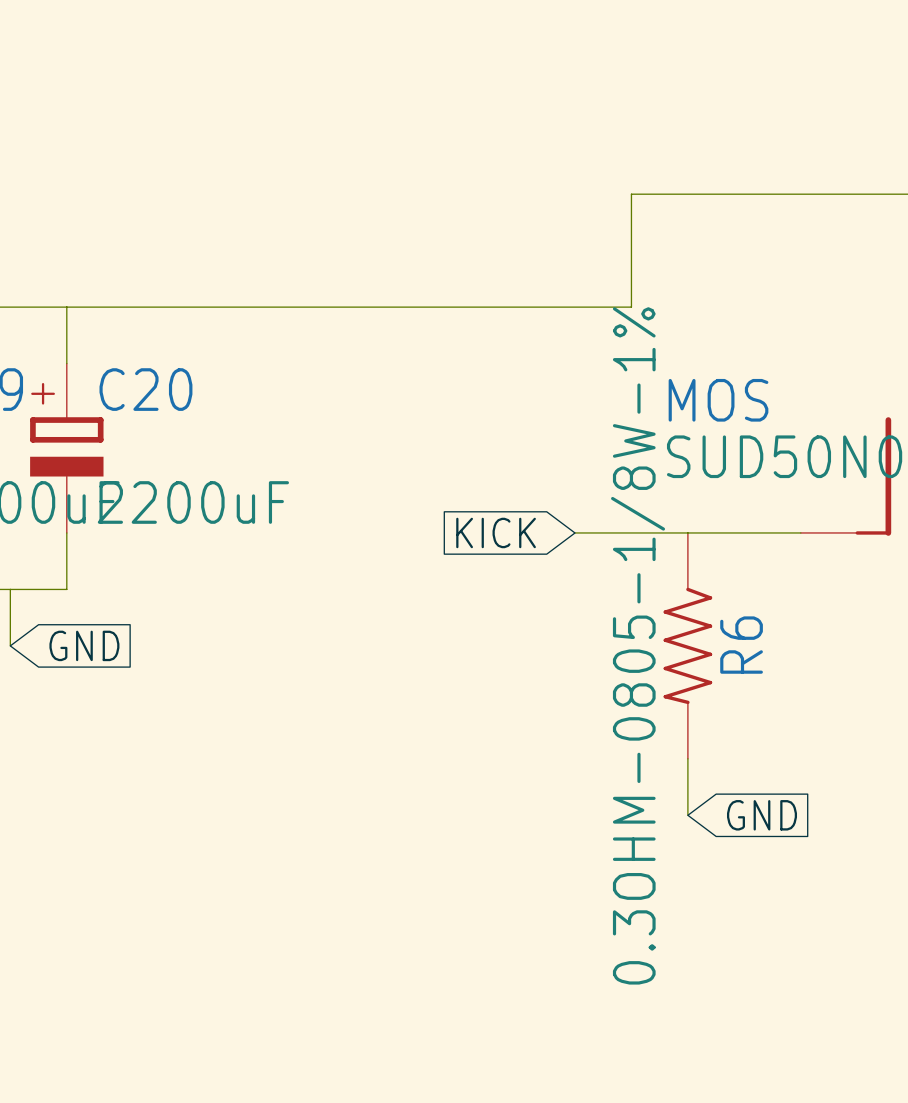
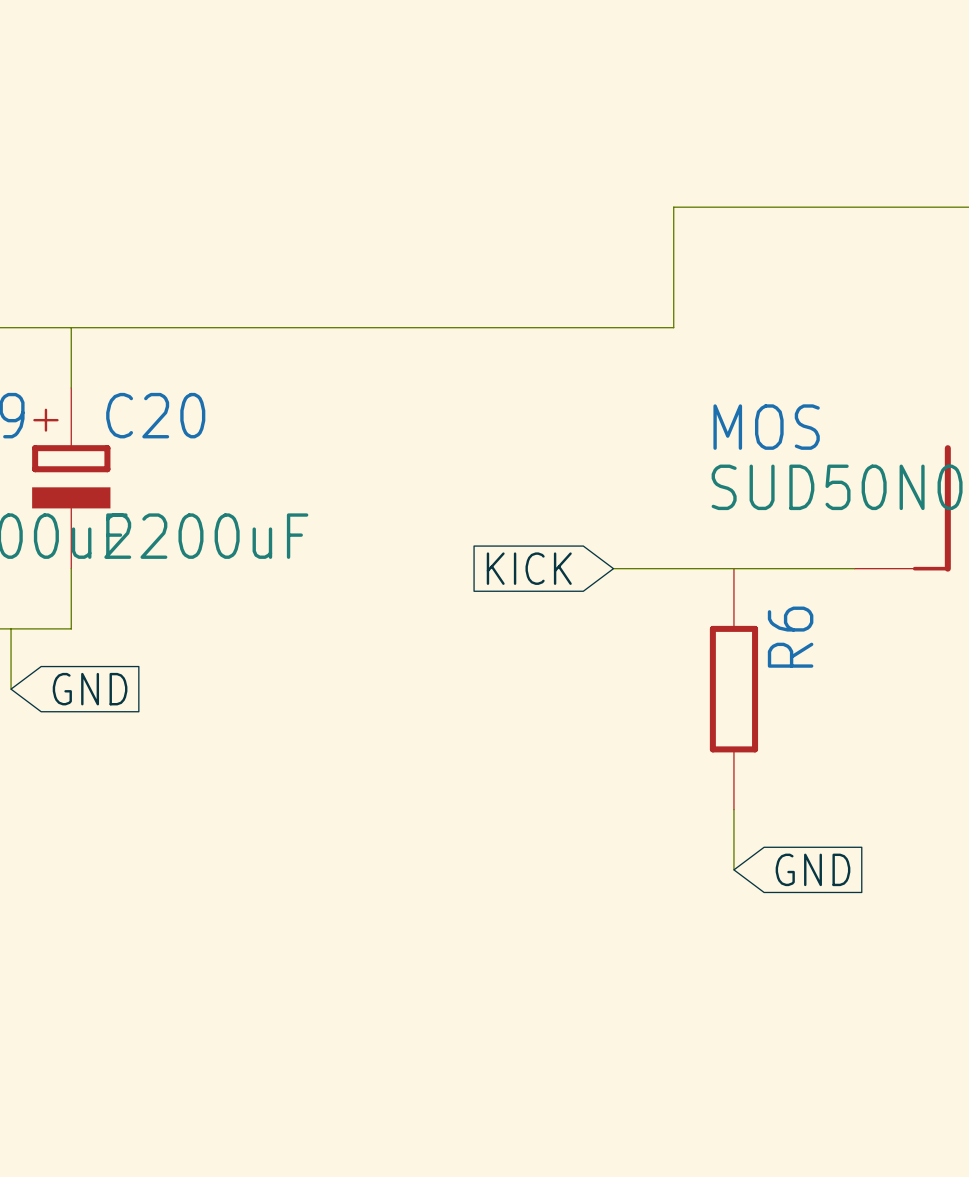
R6 symbol: [663, 532, 713, 759] -> [709, 568, 759, 810]
R6 value: 0.3OHM-0805-1/8W-1% (638, 645) -> none
R6 name position: R6 (741, 645) -> R6 (790, 637)

